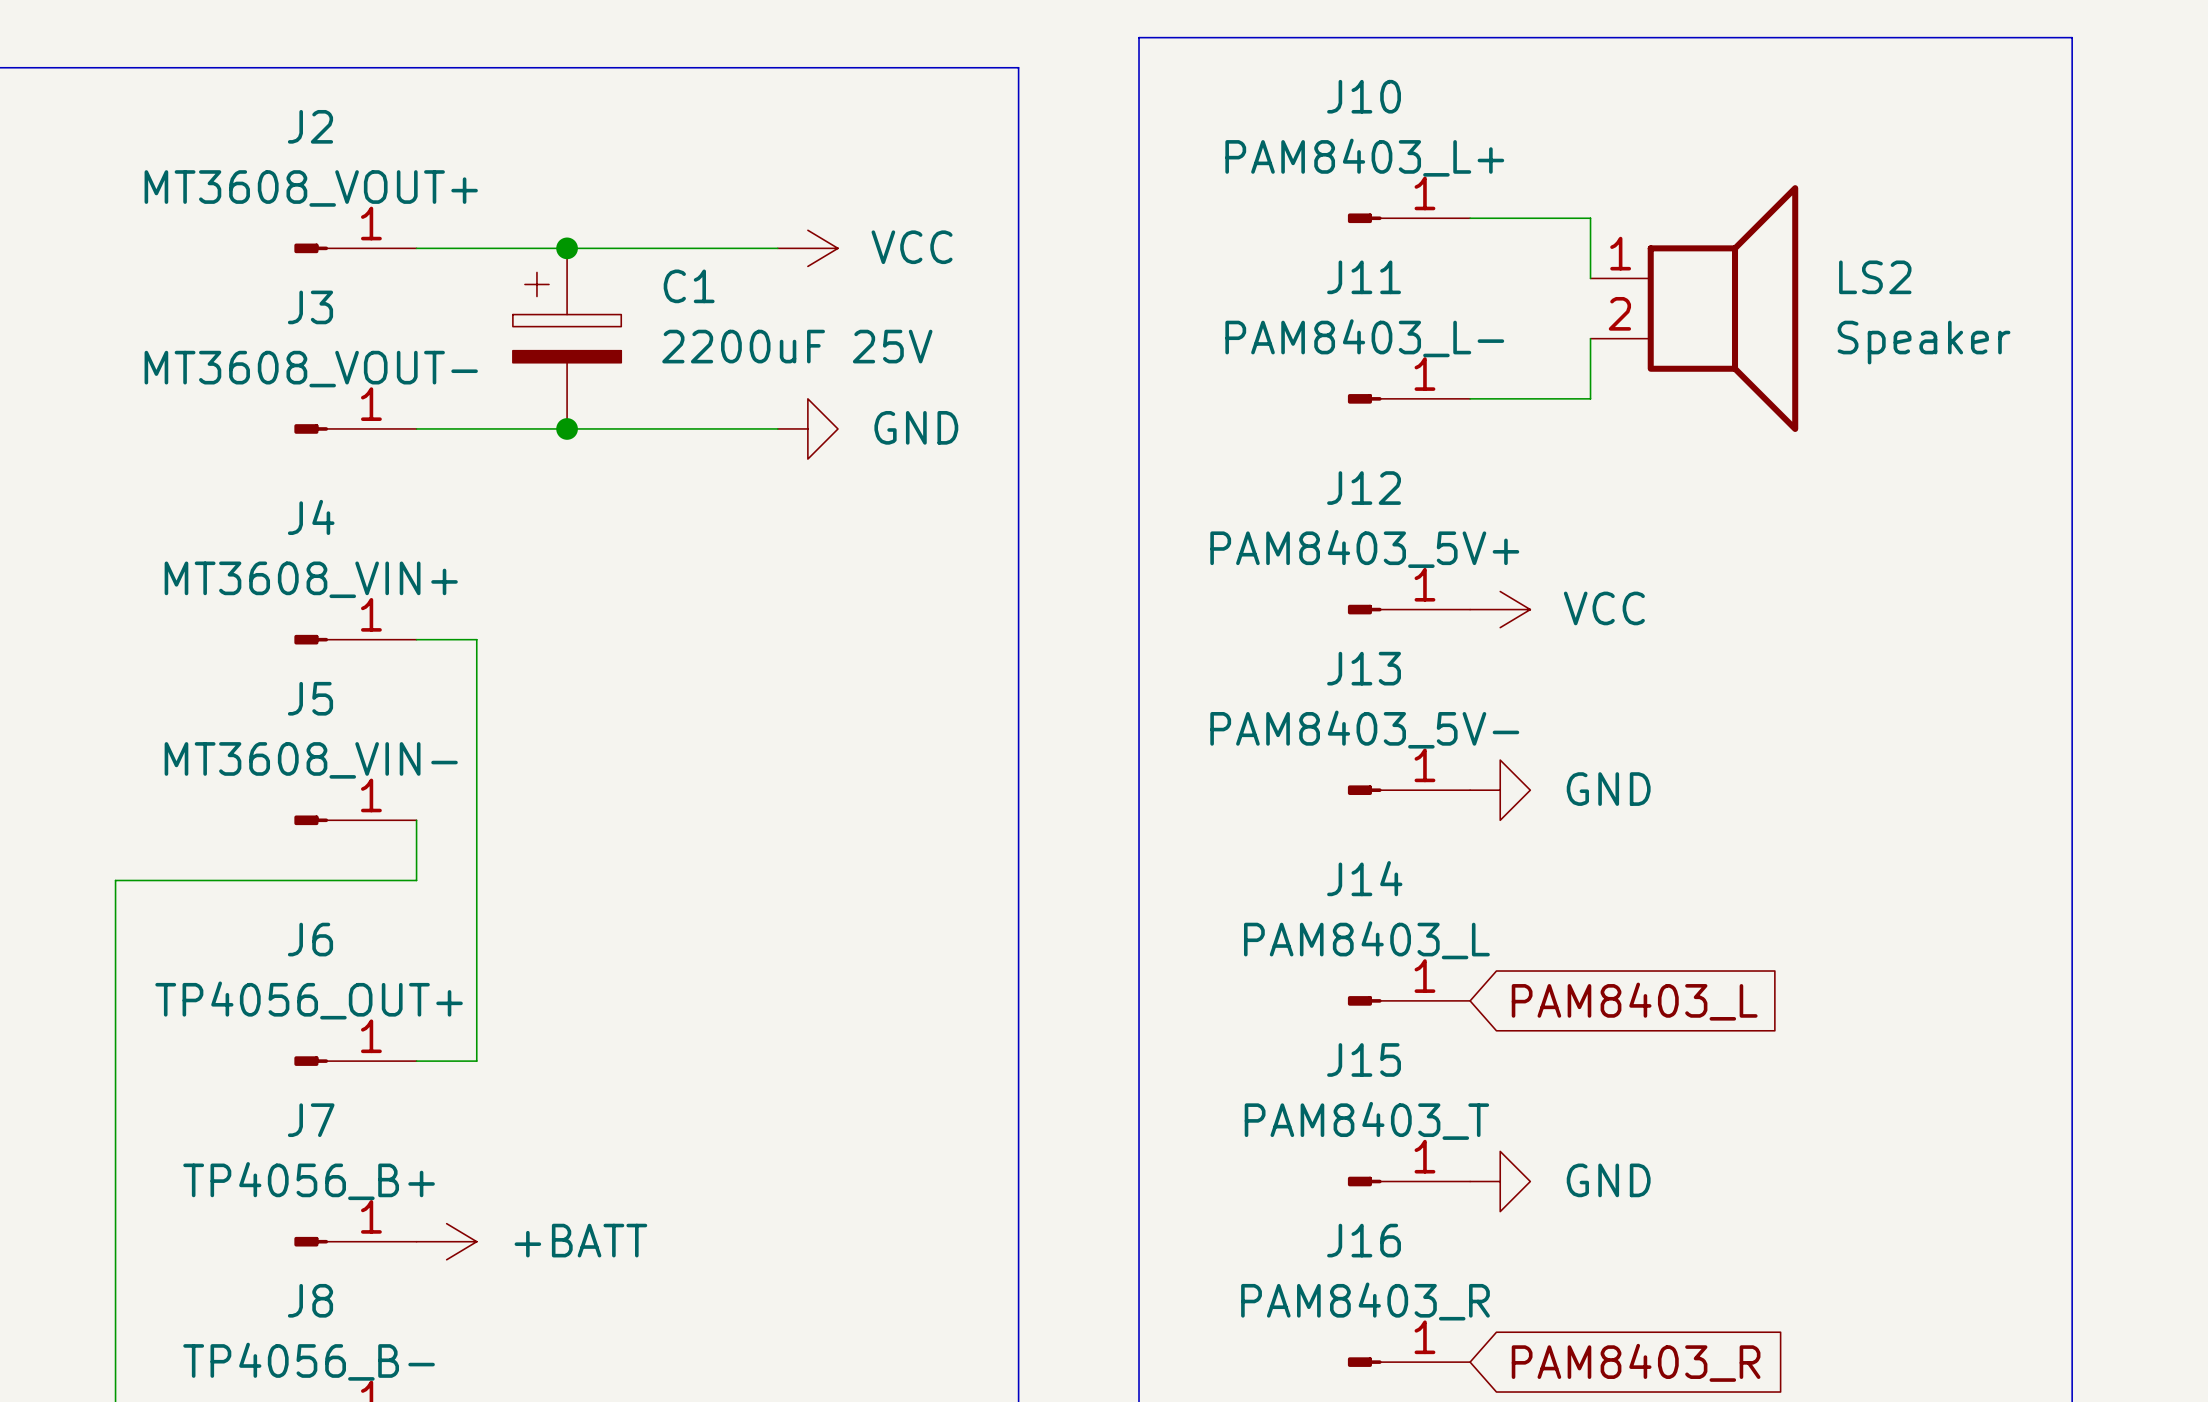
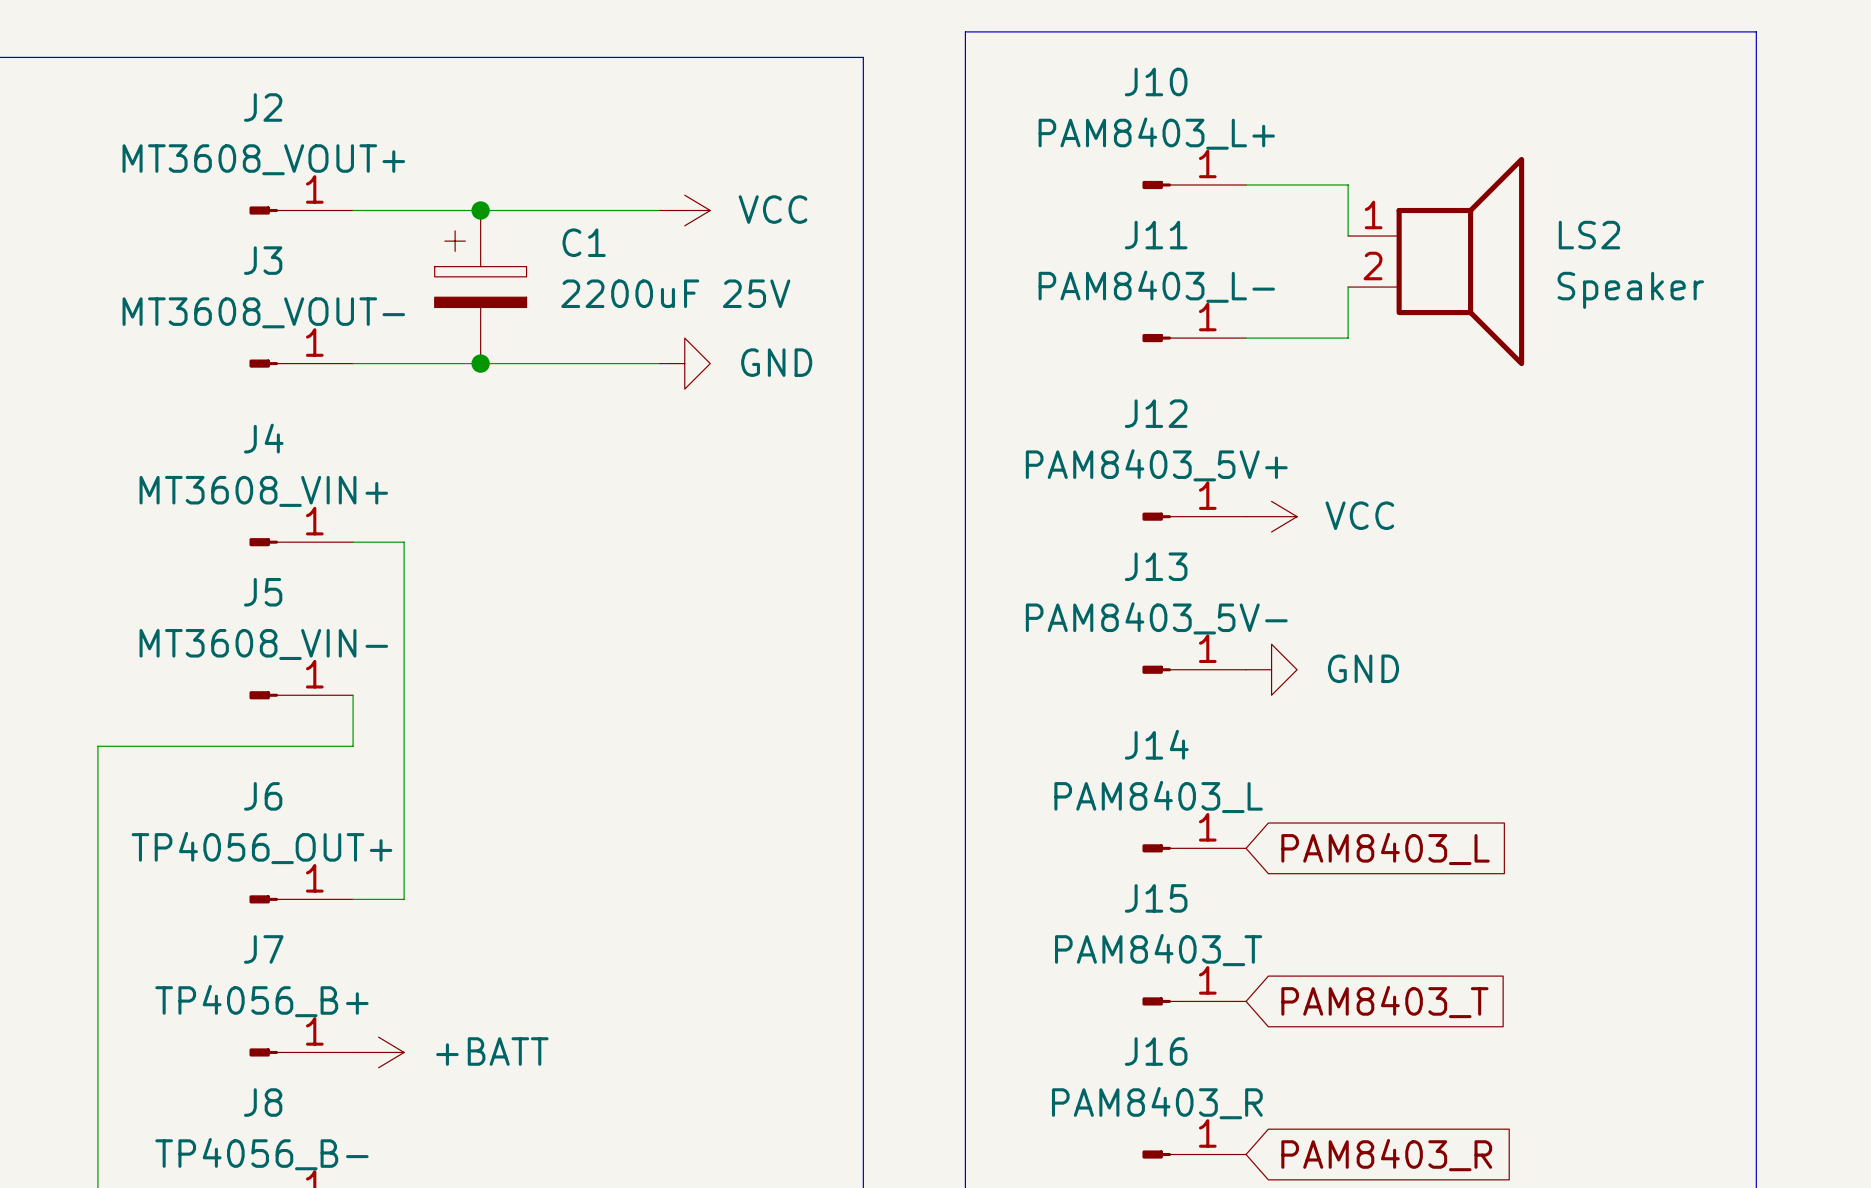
power symbol: GND (1500, 1181) -> none
global label: none -> PAM8403_T (1384, 1002)

